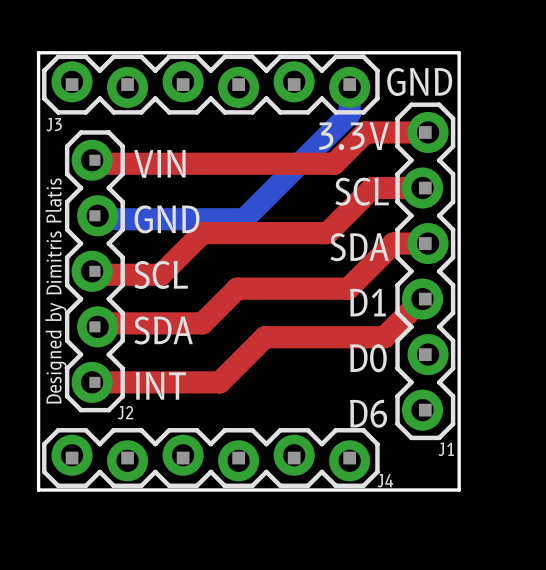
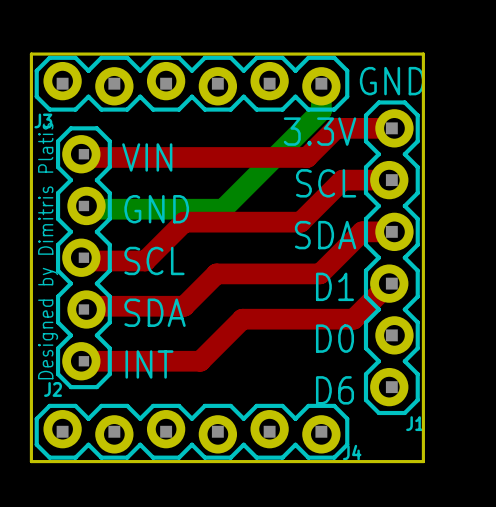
J2 name position: J2 (125, 412) -> J2 (53, 389)

